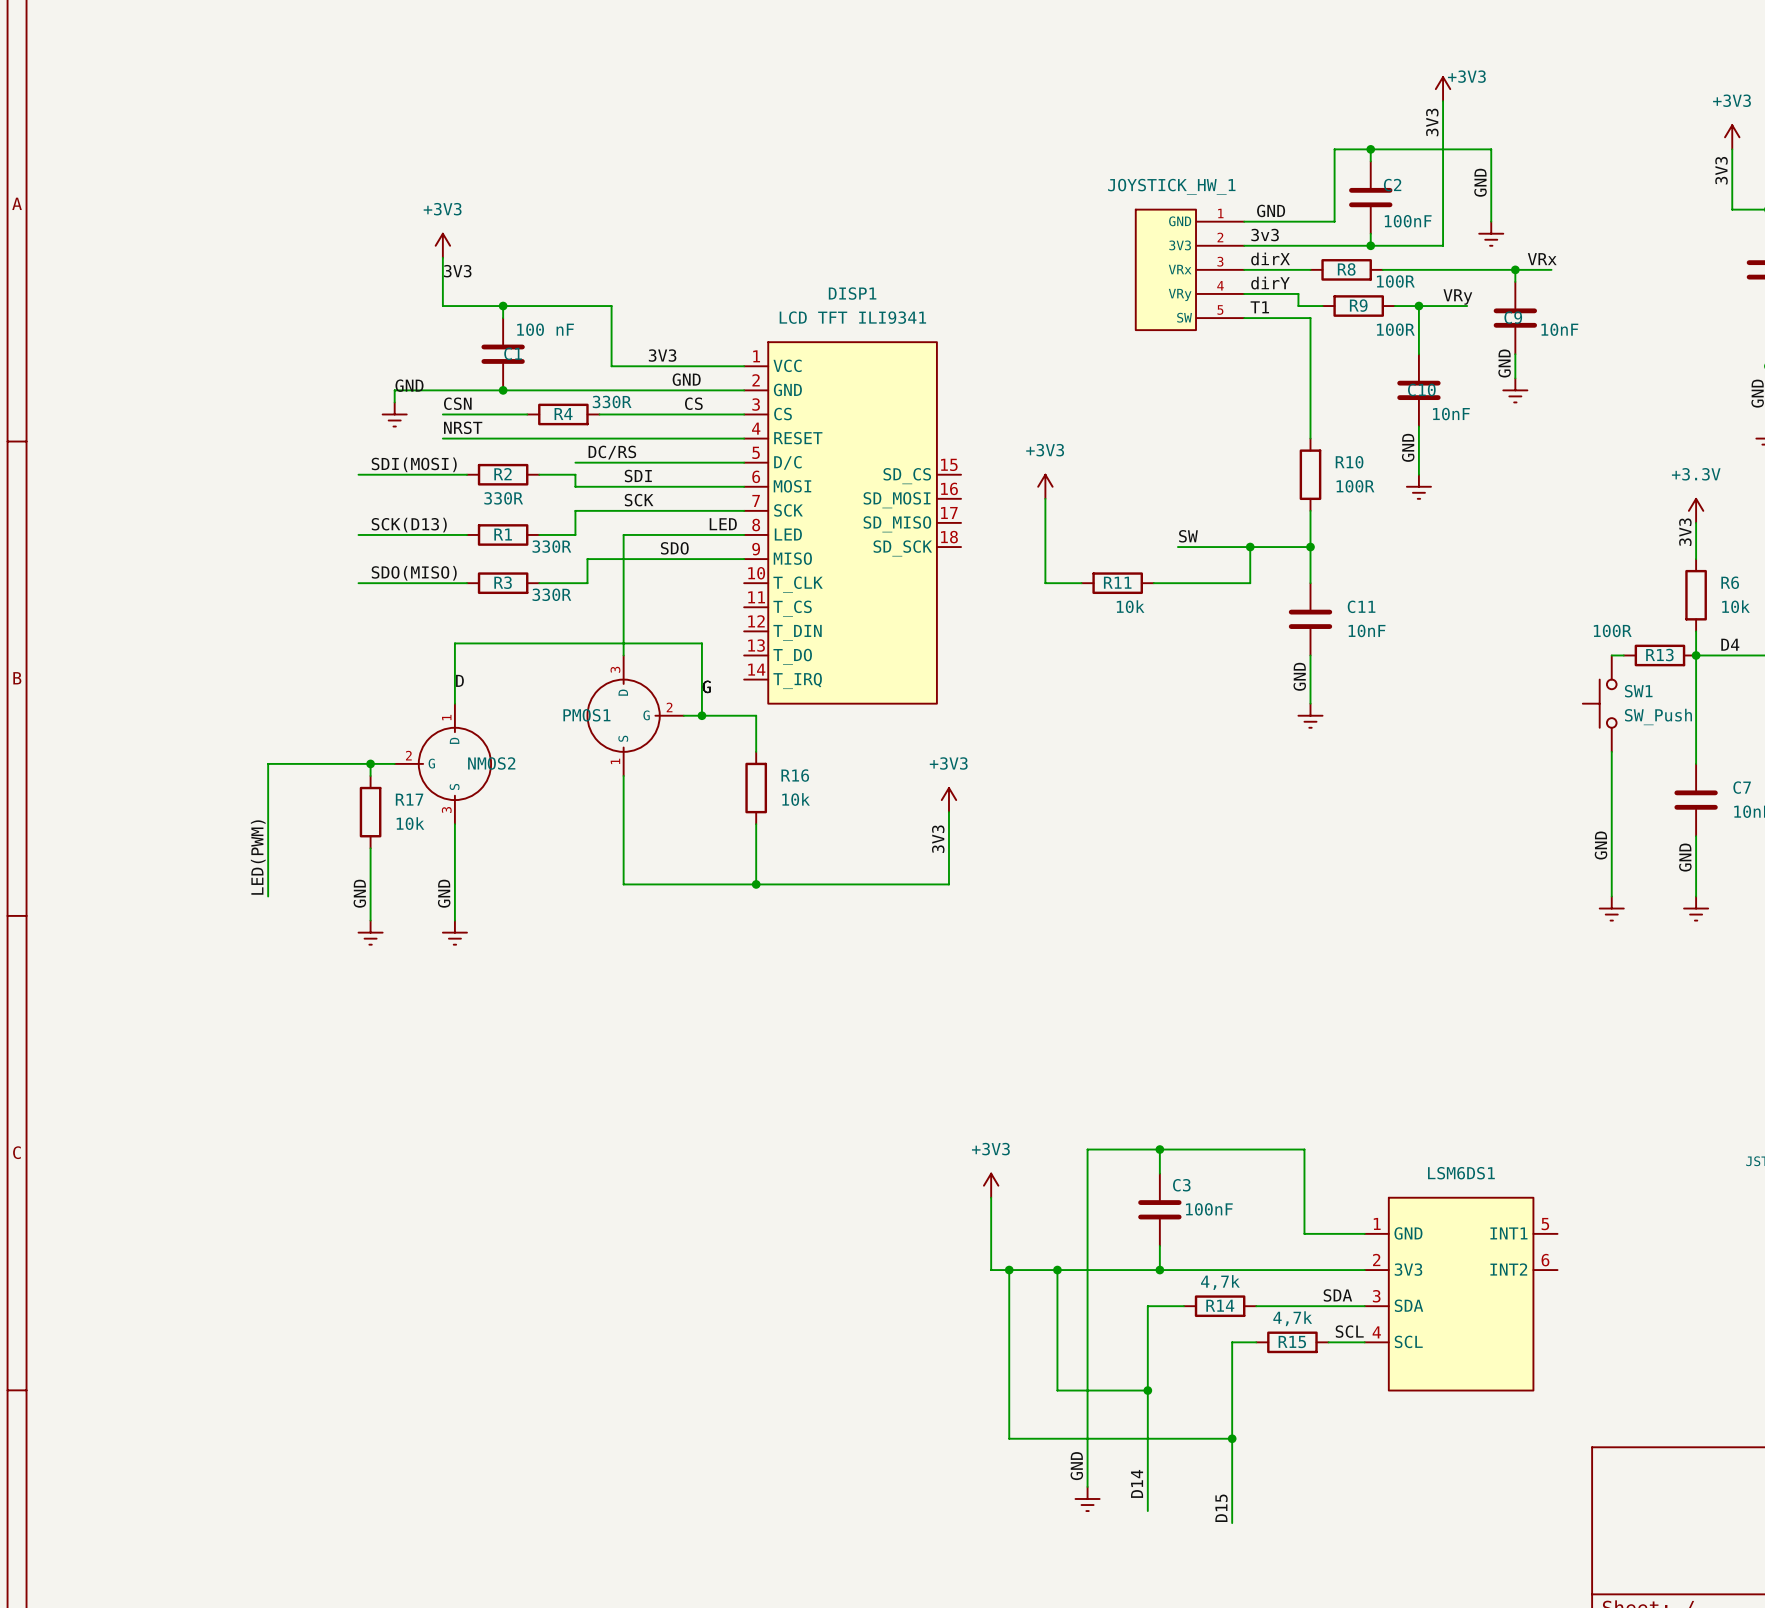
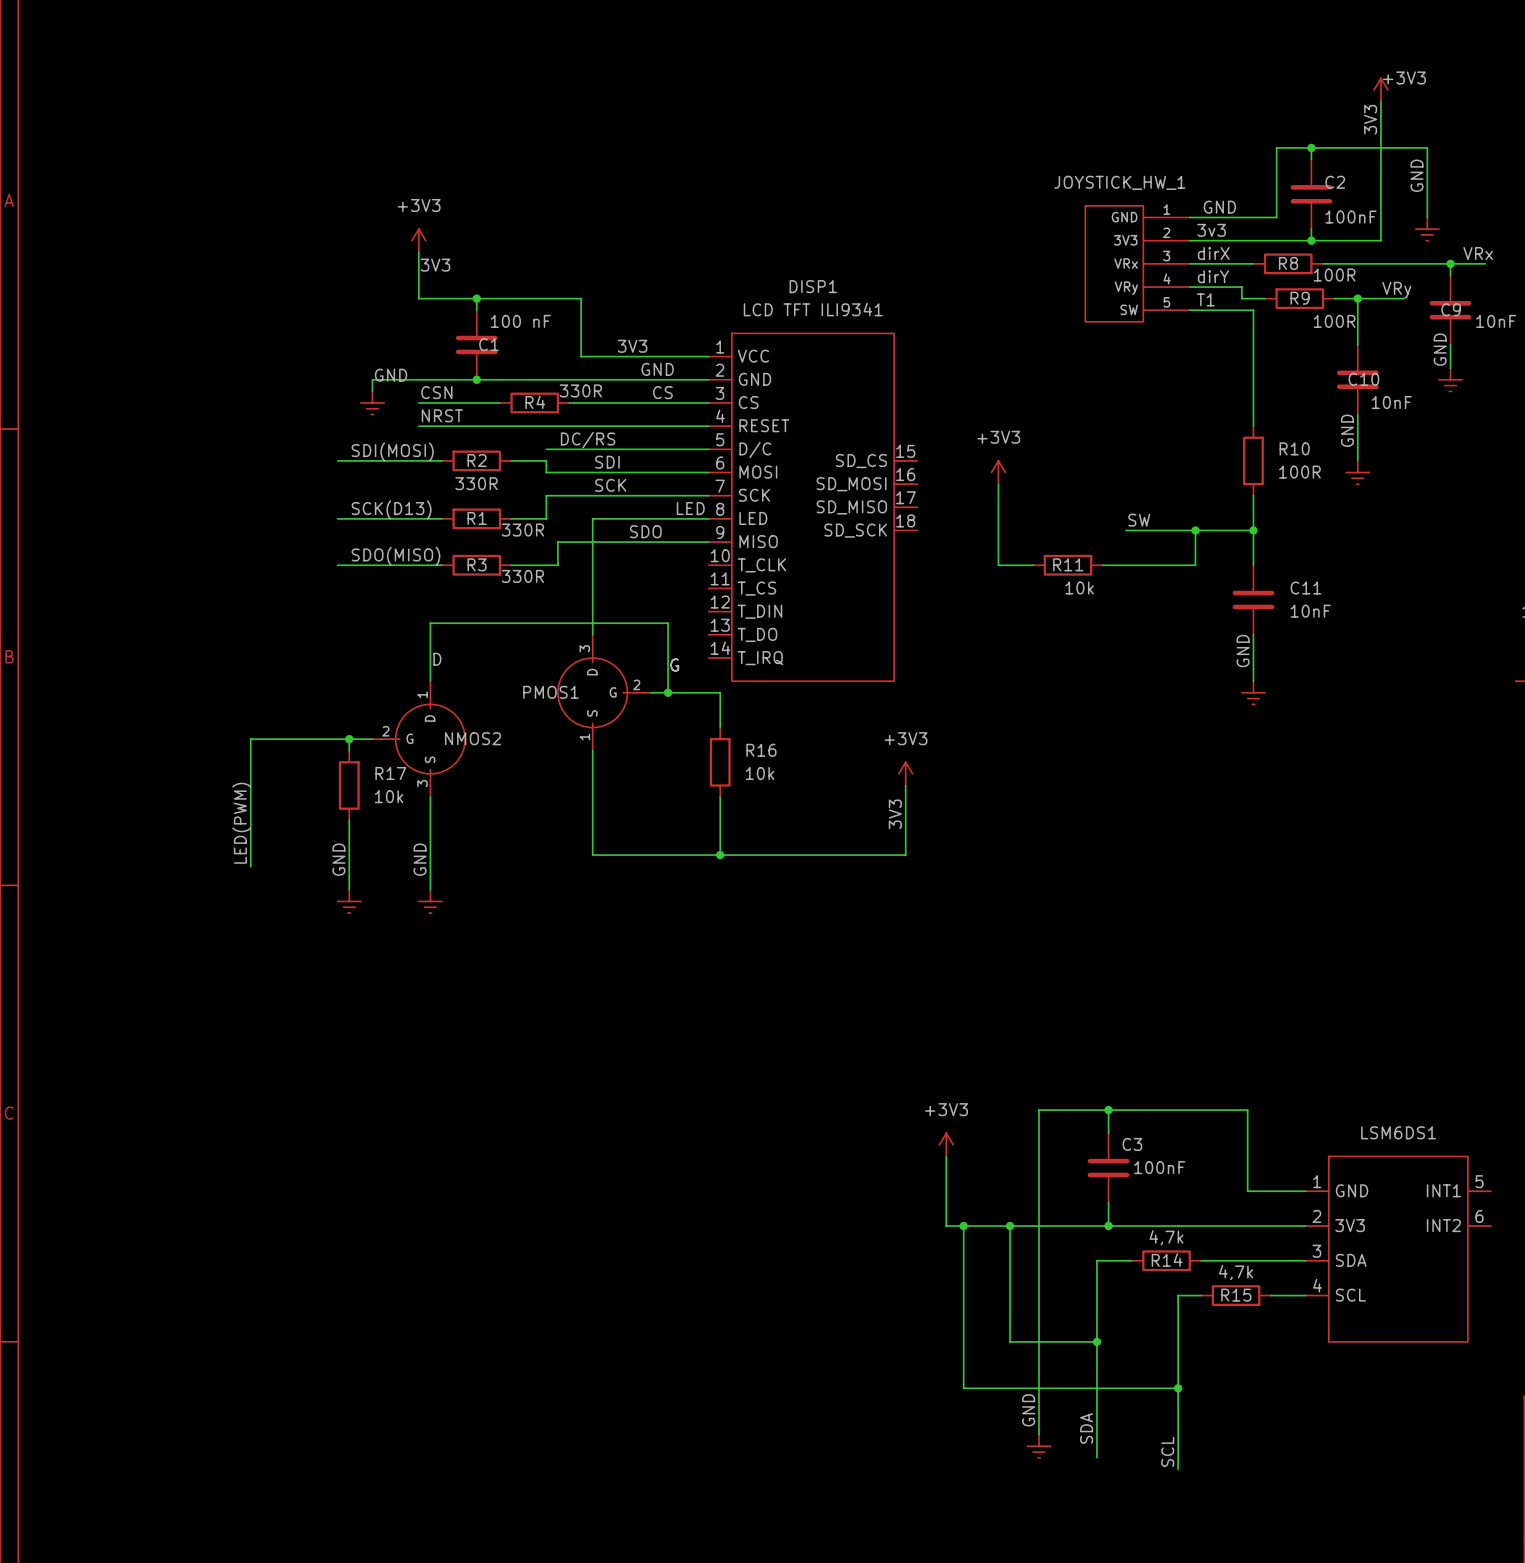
label: SDA (1337, 1295) -> none
label: SCL (1349, 1331) -> none
label: D14 (1137, 1483) -> SDA (1086, 1428)
label: D15 (1221, 1508) -> SCL (1167, 1451)

